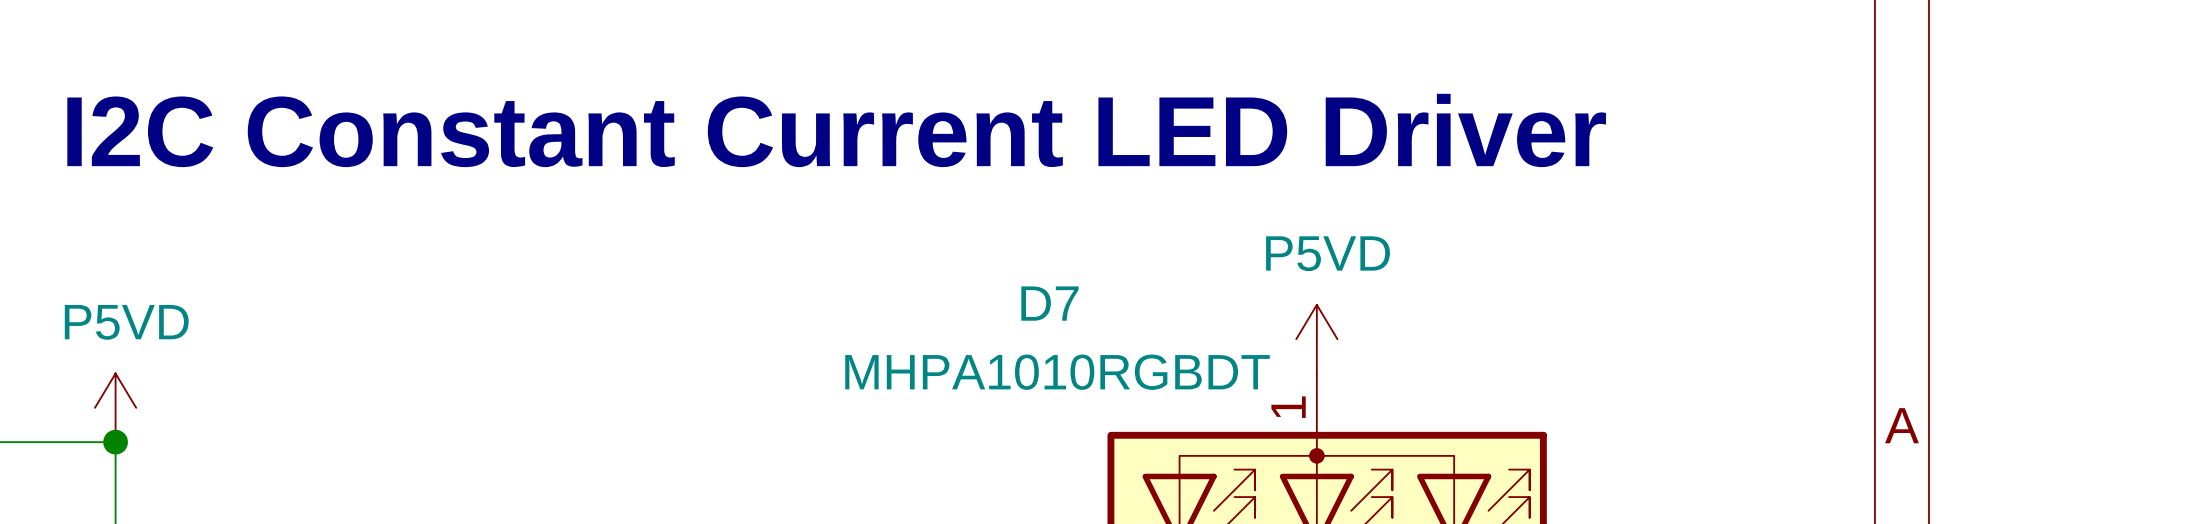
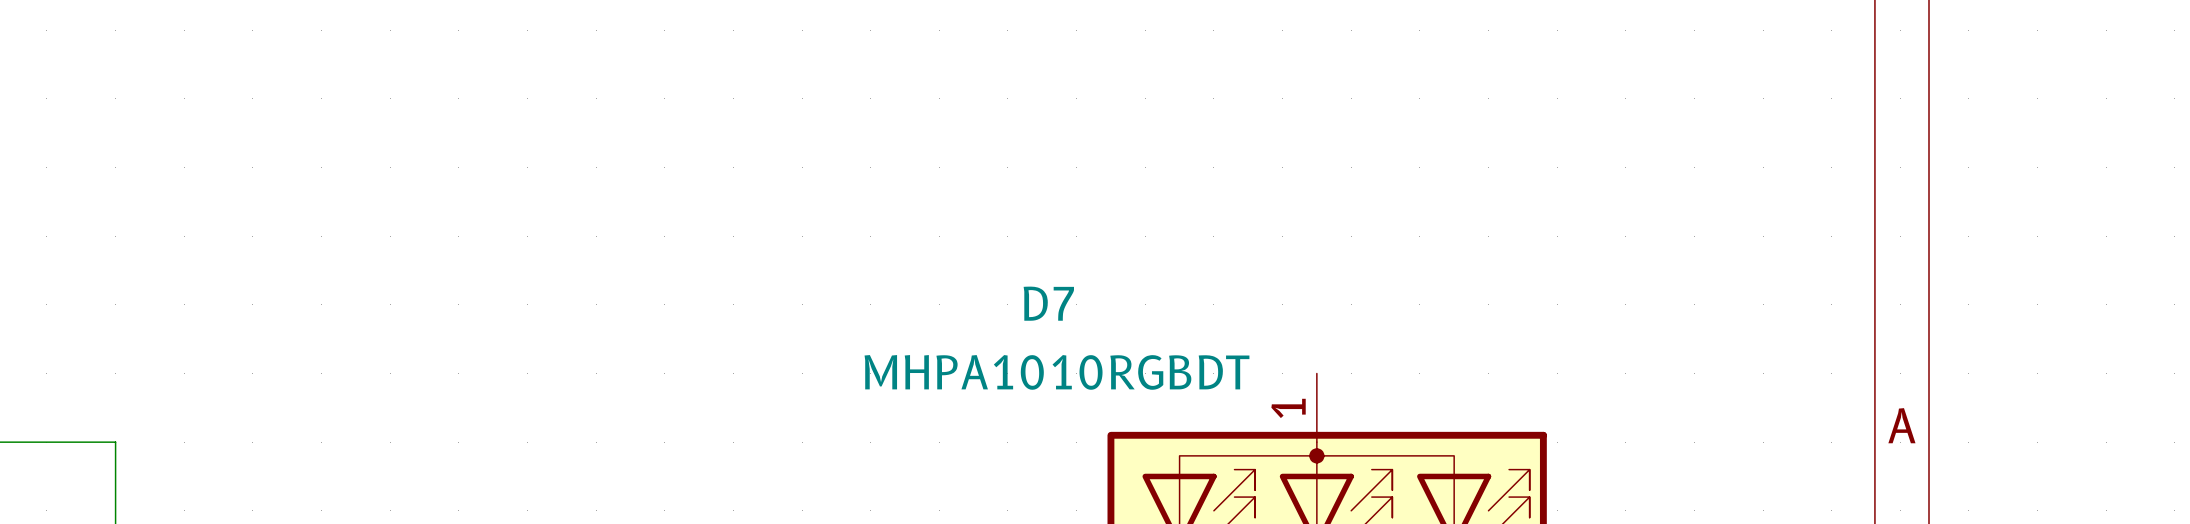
text: I2C Constant Current LED Driver (836, 130) -> none
power symbol: P5VD (1316, 339) -> none
power symbol: P5VD (115, 407) -> none
junction: (115, 442) -> none

